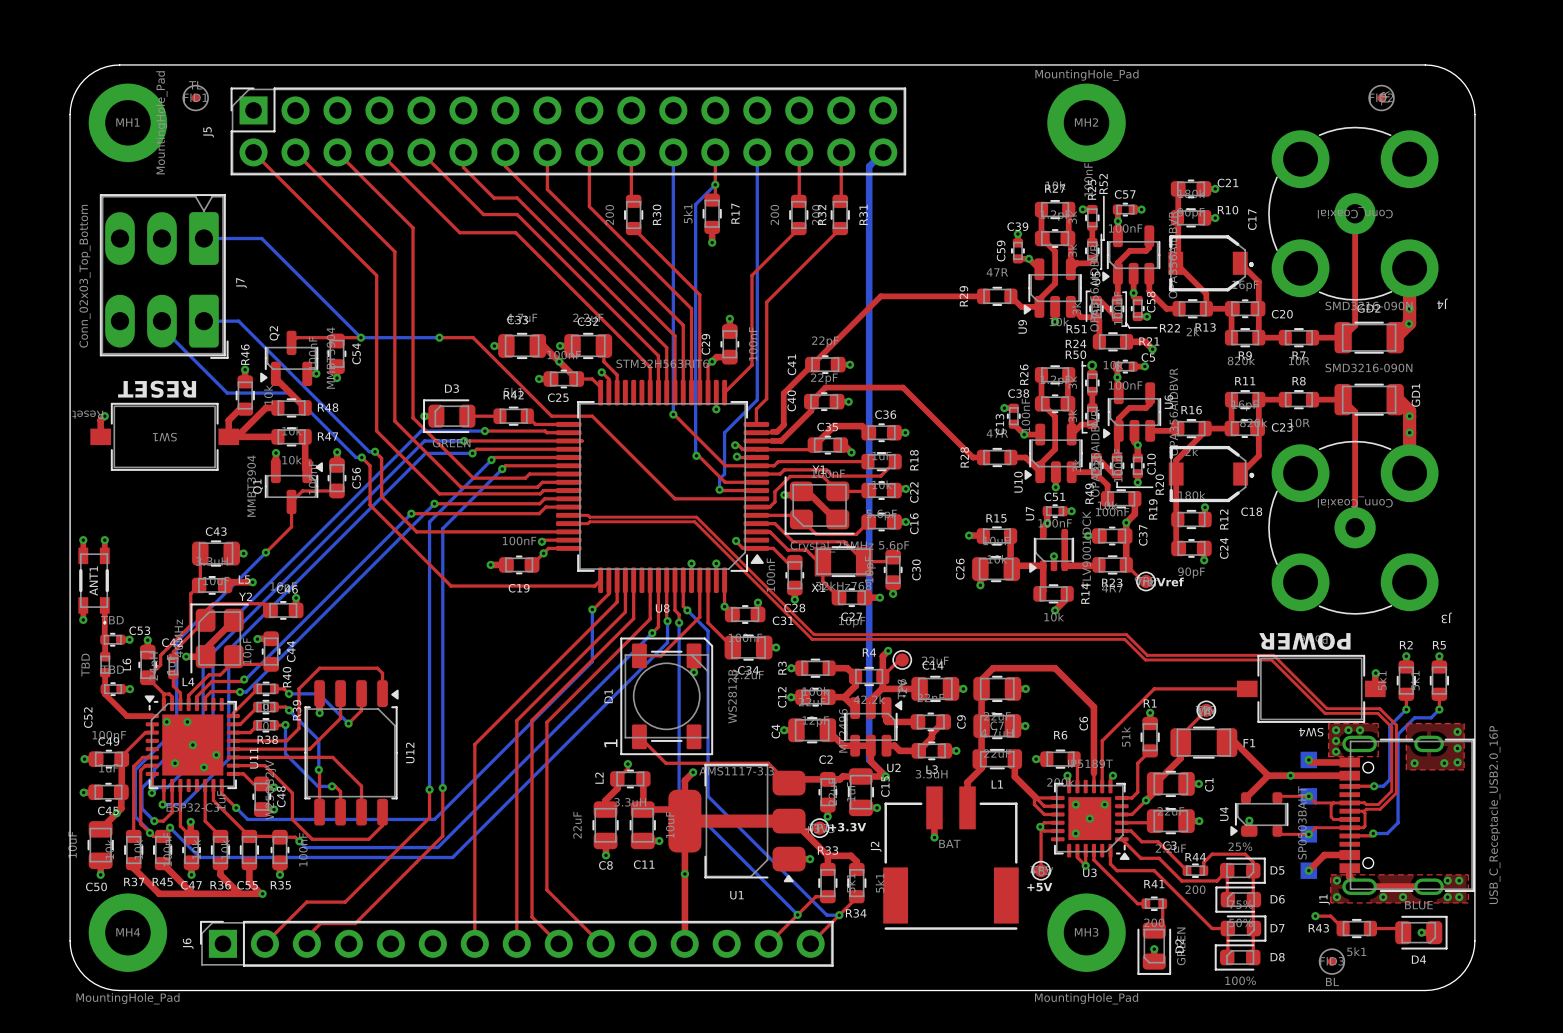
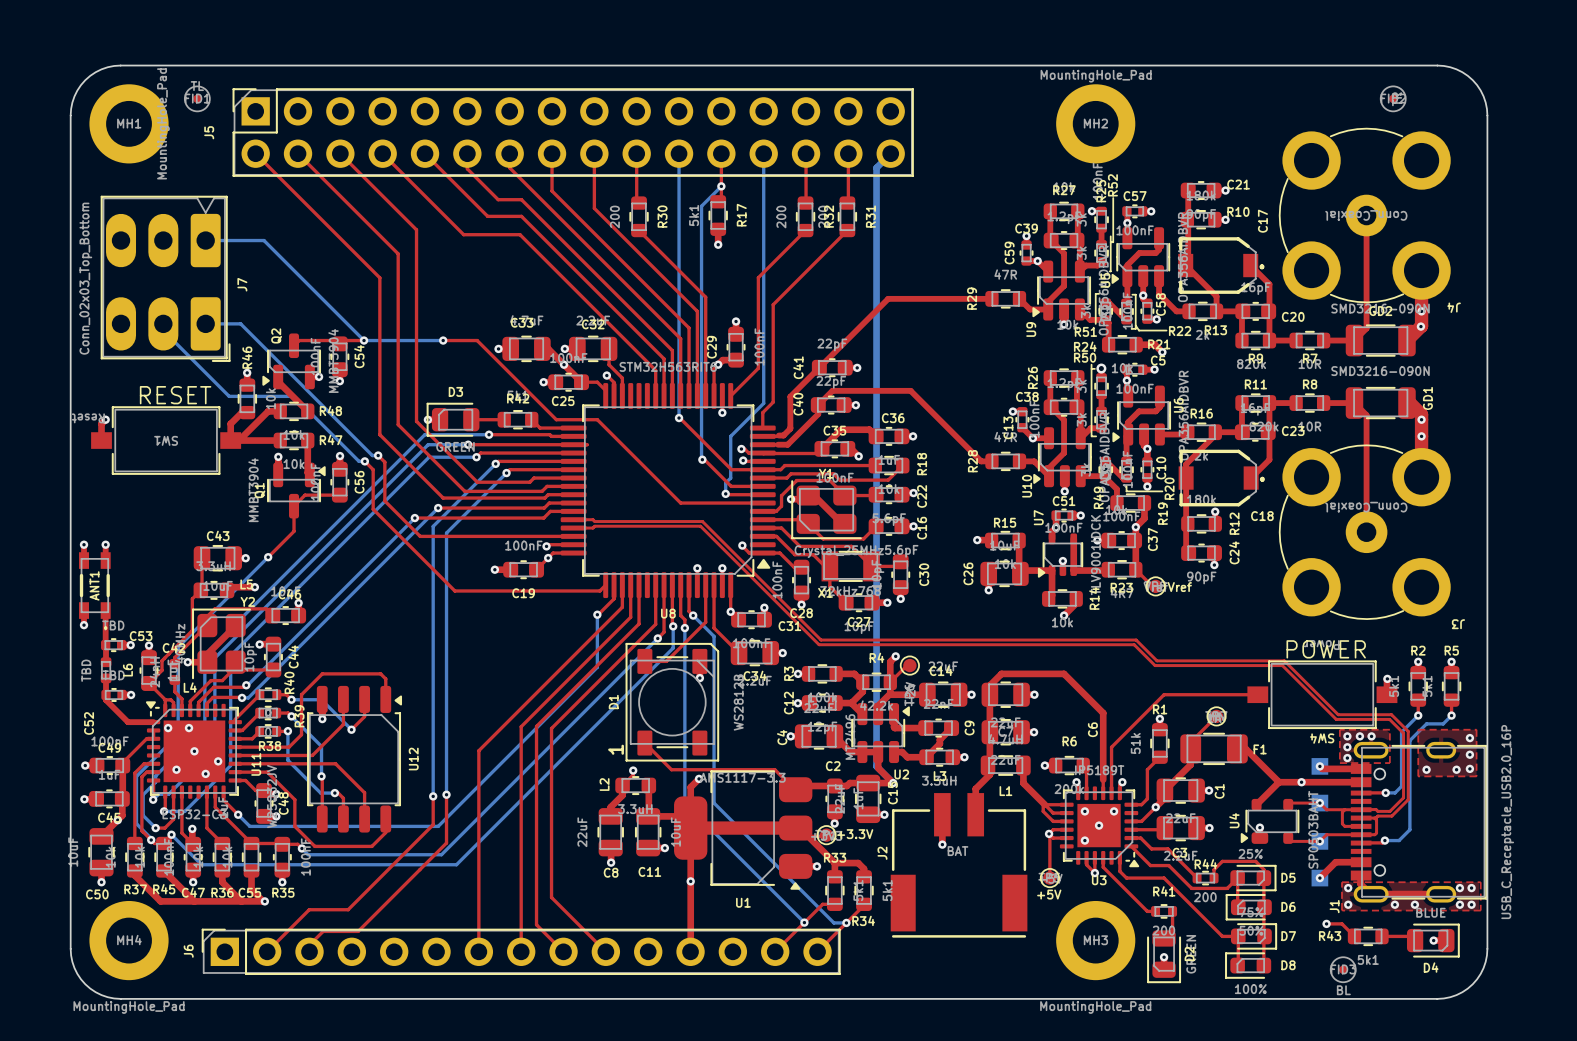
text rotation: 0° (157, 389) -> 180° (175, 395)
text rotation: 0° (1304, 641) -> 180° (1326, 649)

